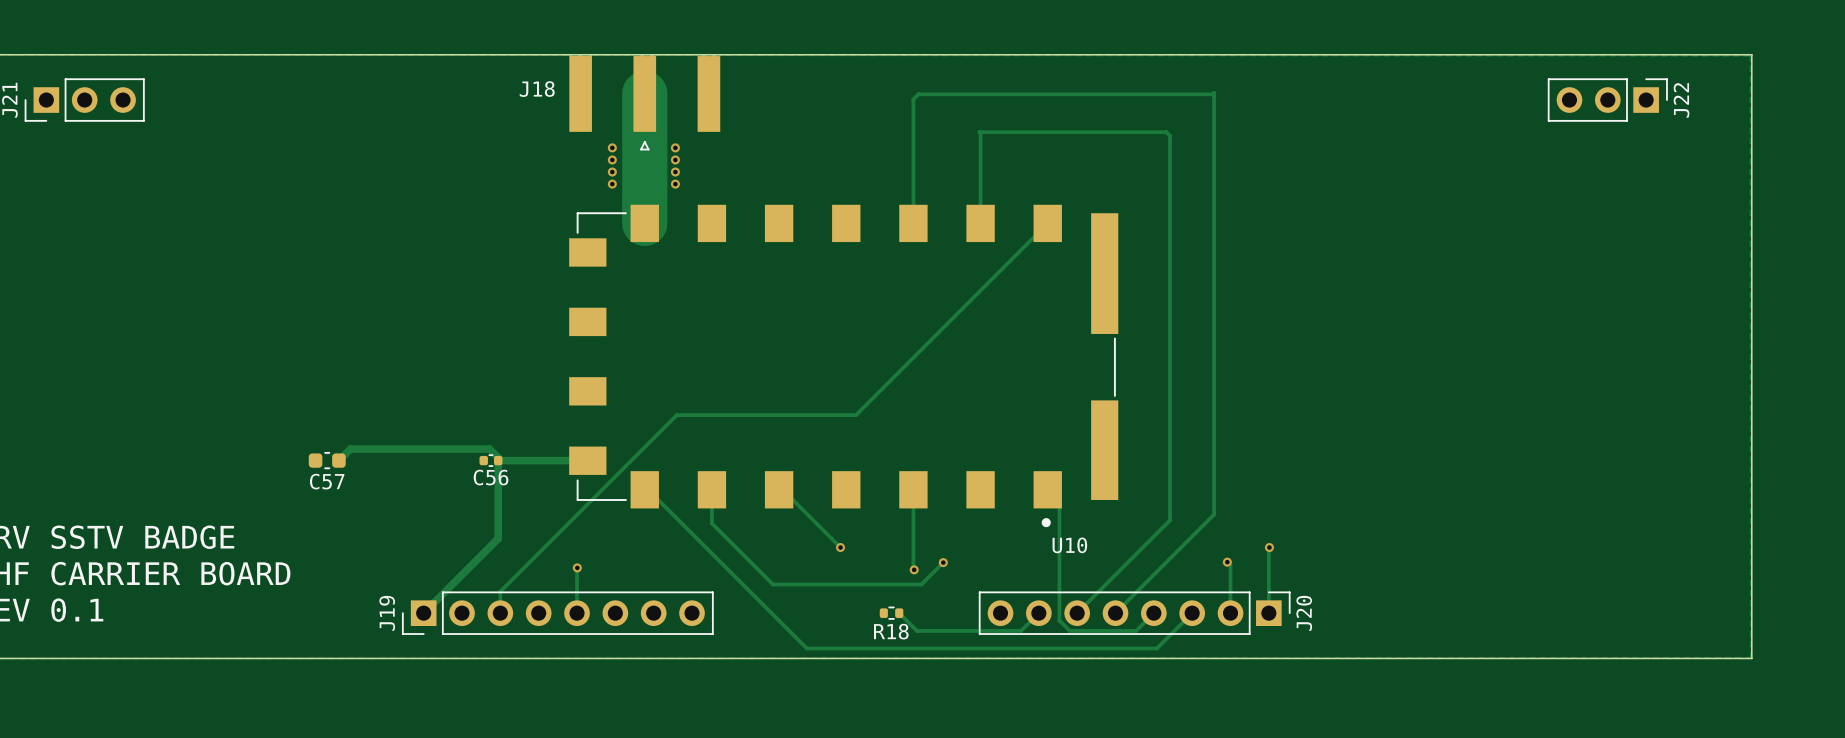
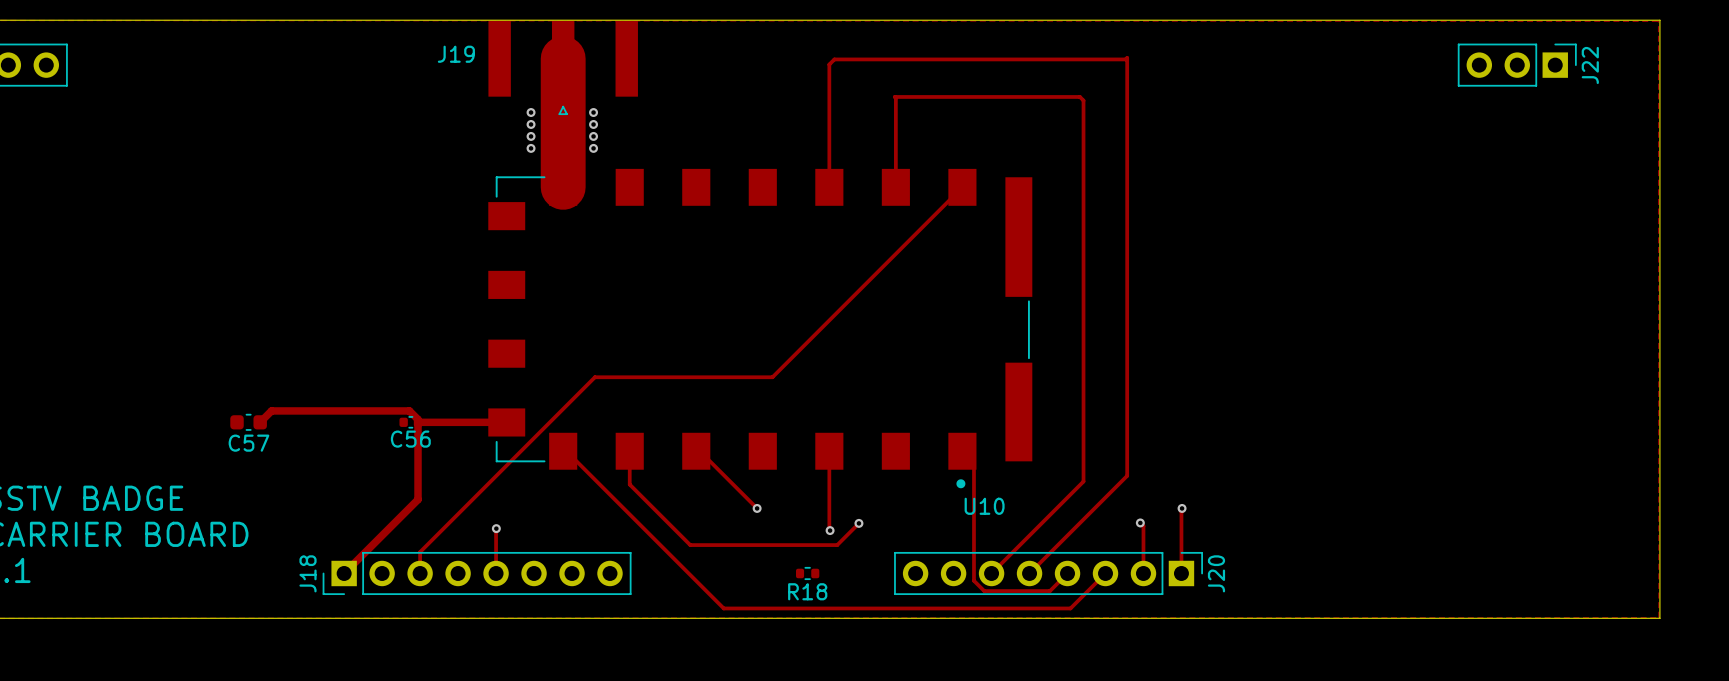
J18 name: J18 (537, 89) -> J19 (456, 54)
J19 name: J19 (387, 613) -> J18 (308, 573)
track: (899, 613) (916, 630) (1021, 630) (1038, 613) -> none

